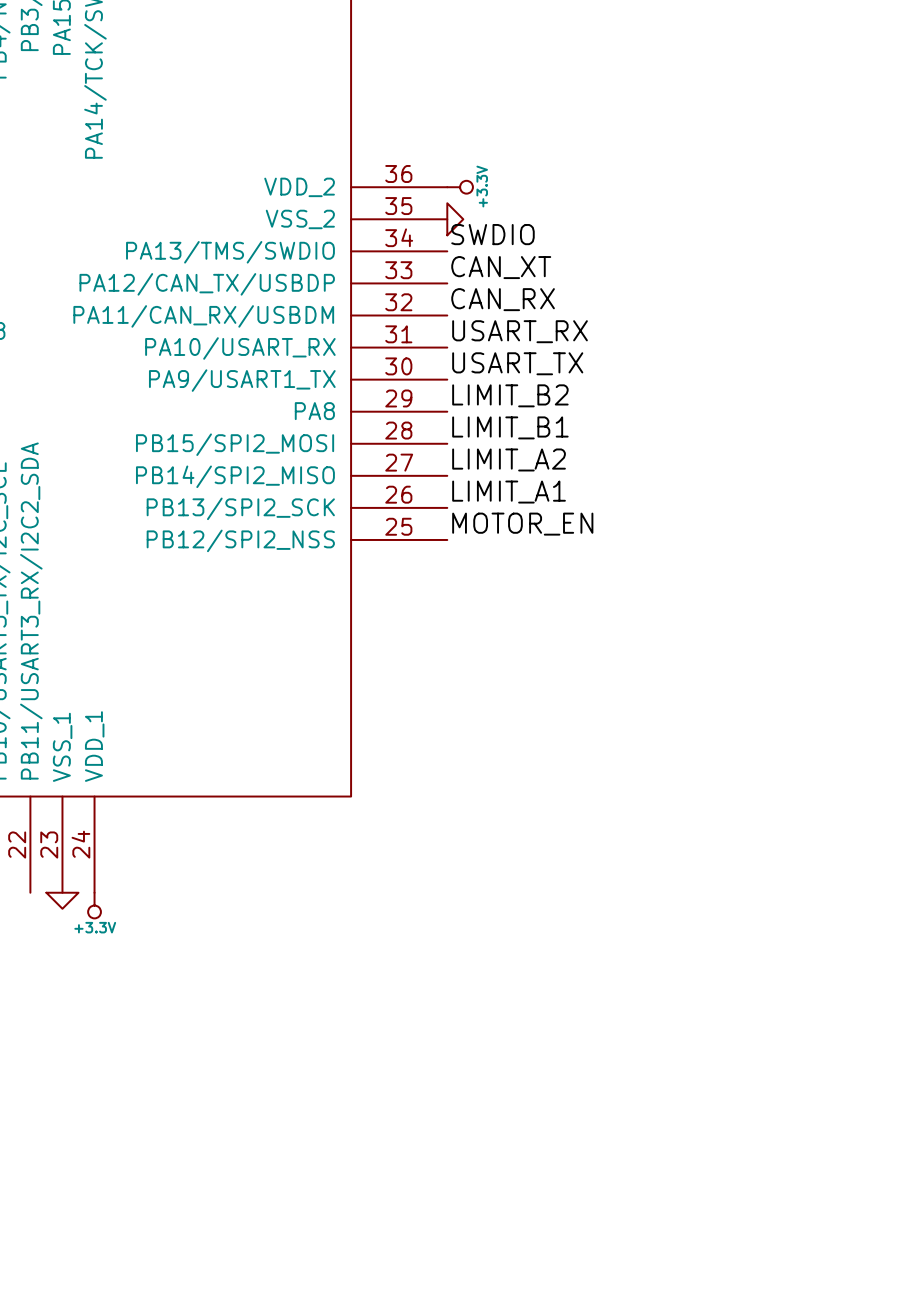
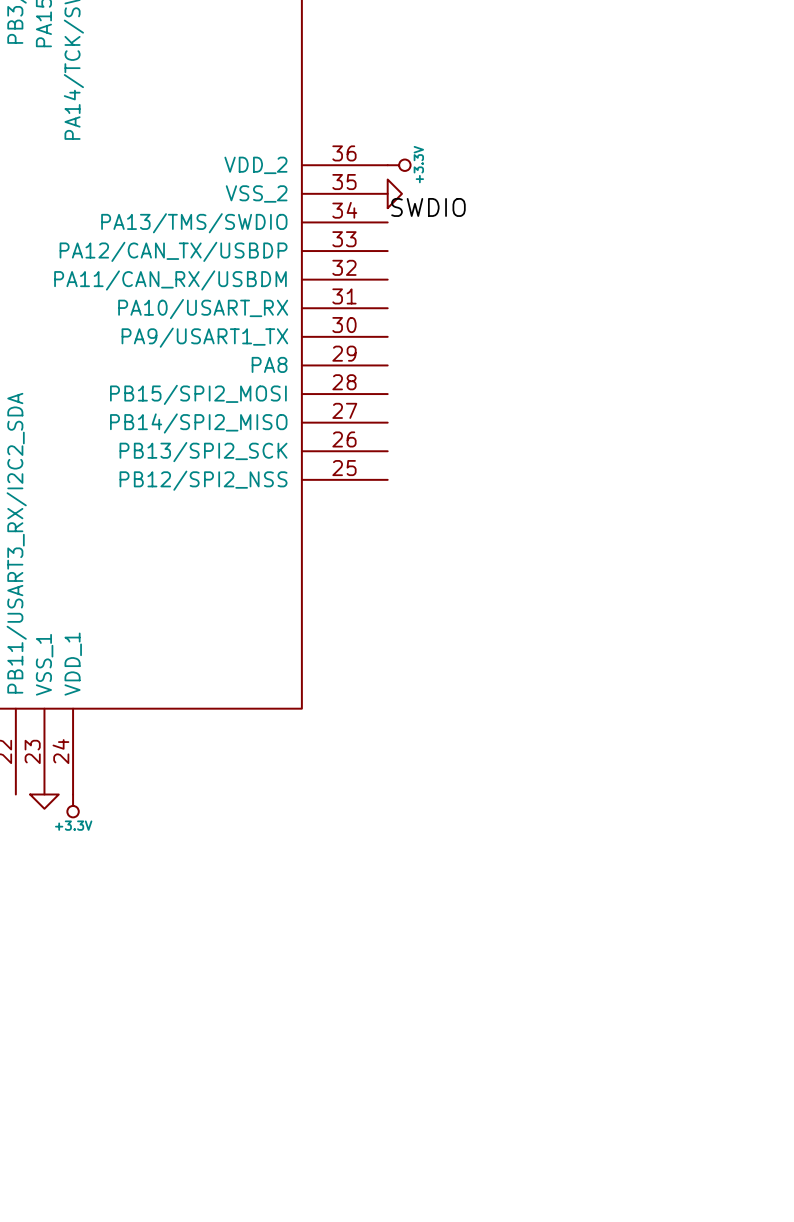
label: CAN_XT (501, 267) -> none
label: CAN_RX (503, 299) -> none
label: USART_RX (520, 331) -> none
label: USART_TX (517, 363) -> none
label: LIMIT_B2 (510, 395) -> none
label: LIMIT_B1 (510, 427) -> none
label: LIMIT_A2 (509, 459) -> none
label: LIMIT_A1 (509, 492) -> none
label: MOTOR_EN (522, 524) -> none

